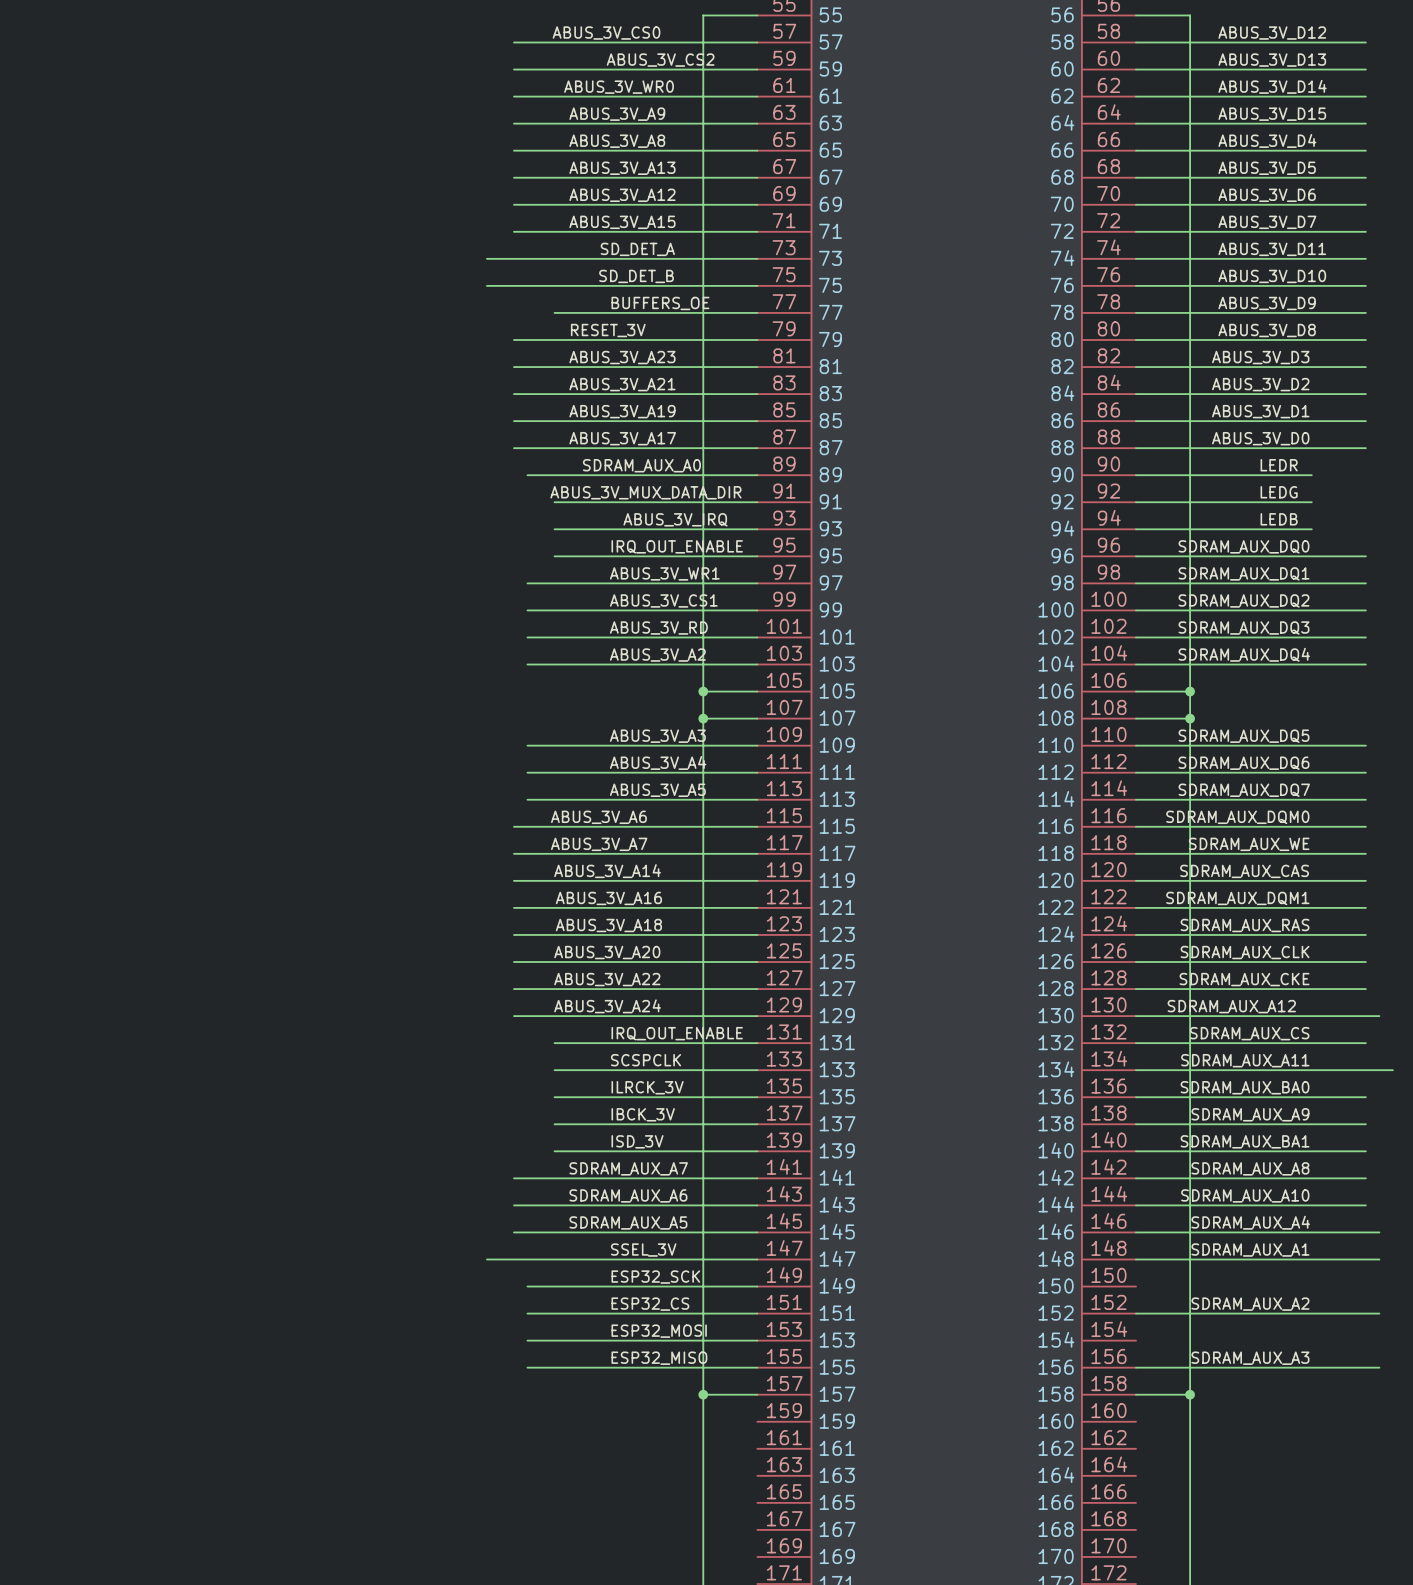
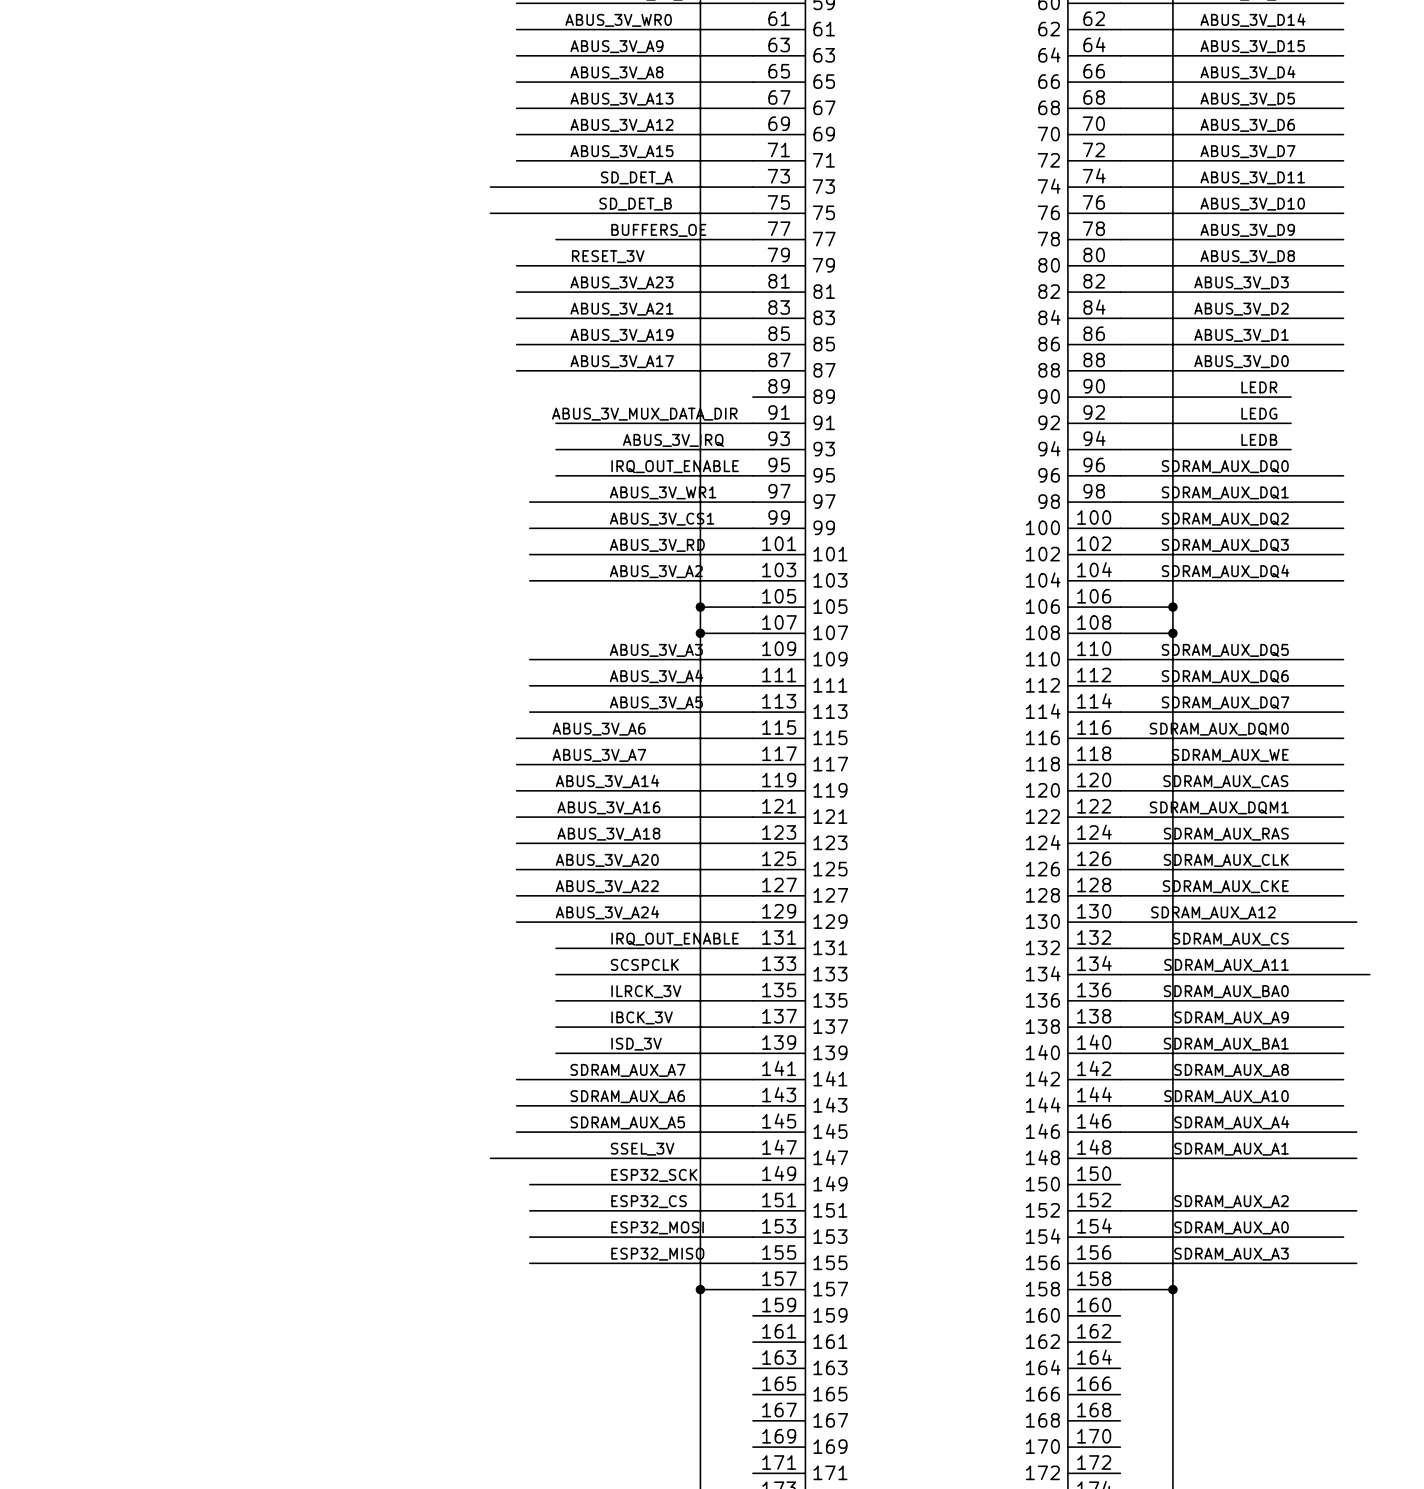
label: SDRAM_AUX_A0 (641, 465) -> none
wire: (527, 475) (757, 475) -> none
label: none -> SDRAM_AUX_A0 (1231, 1227)
wire: none -> (1120, 1237) (1343, 1237)

